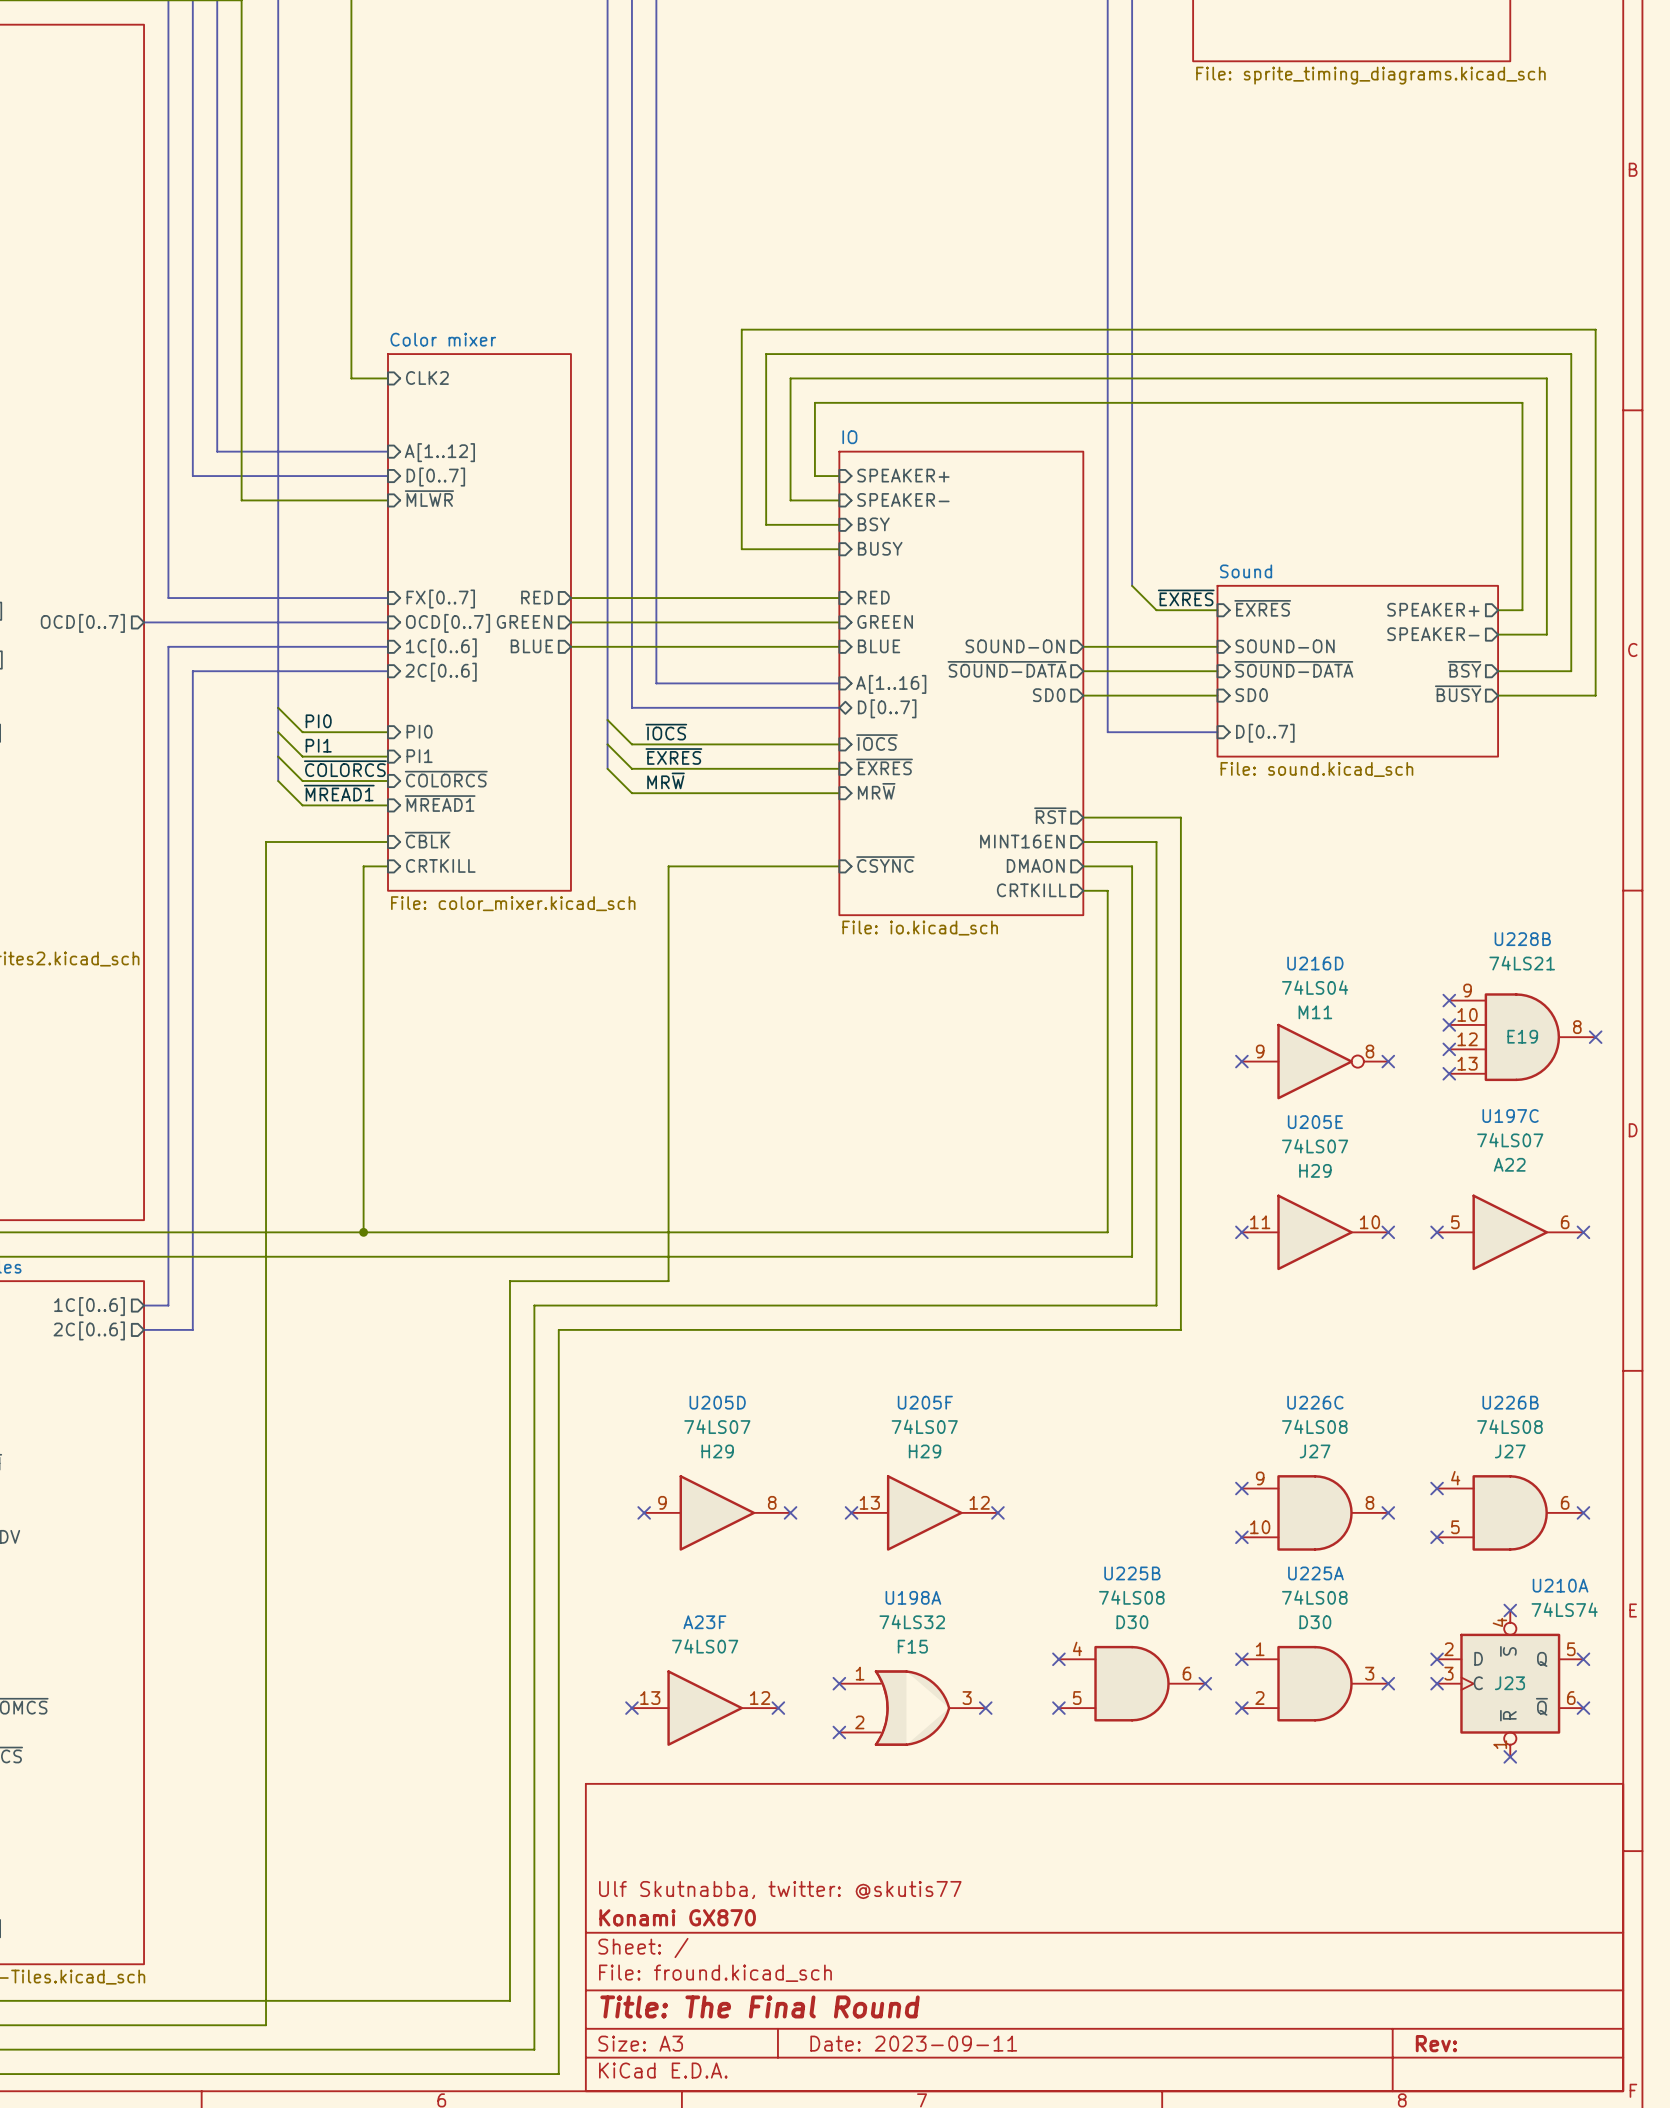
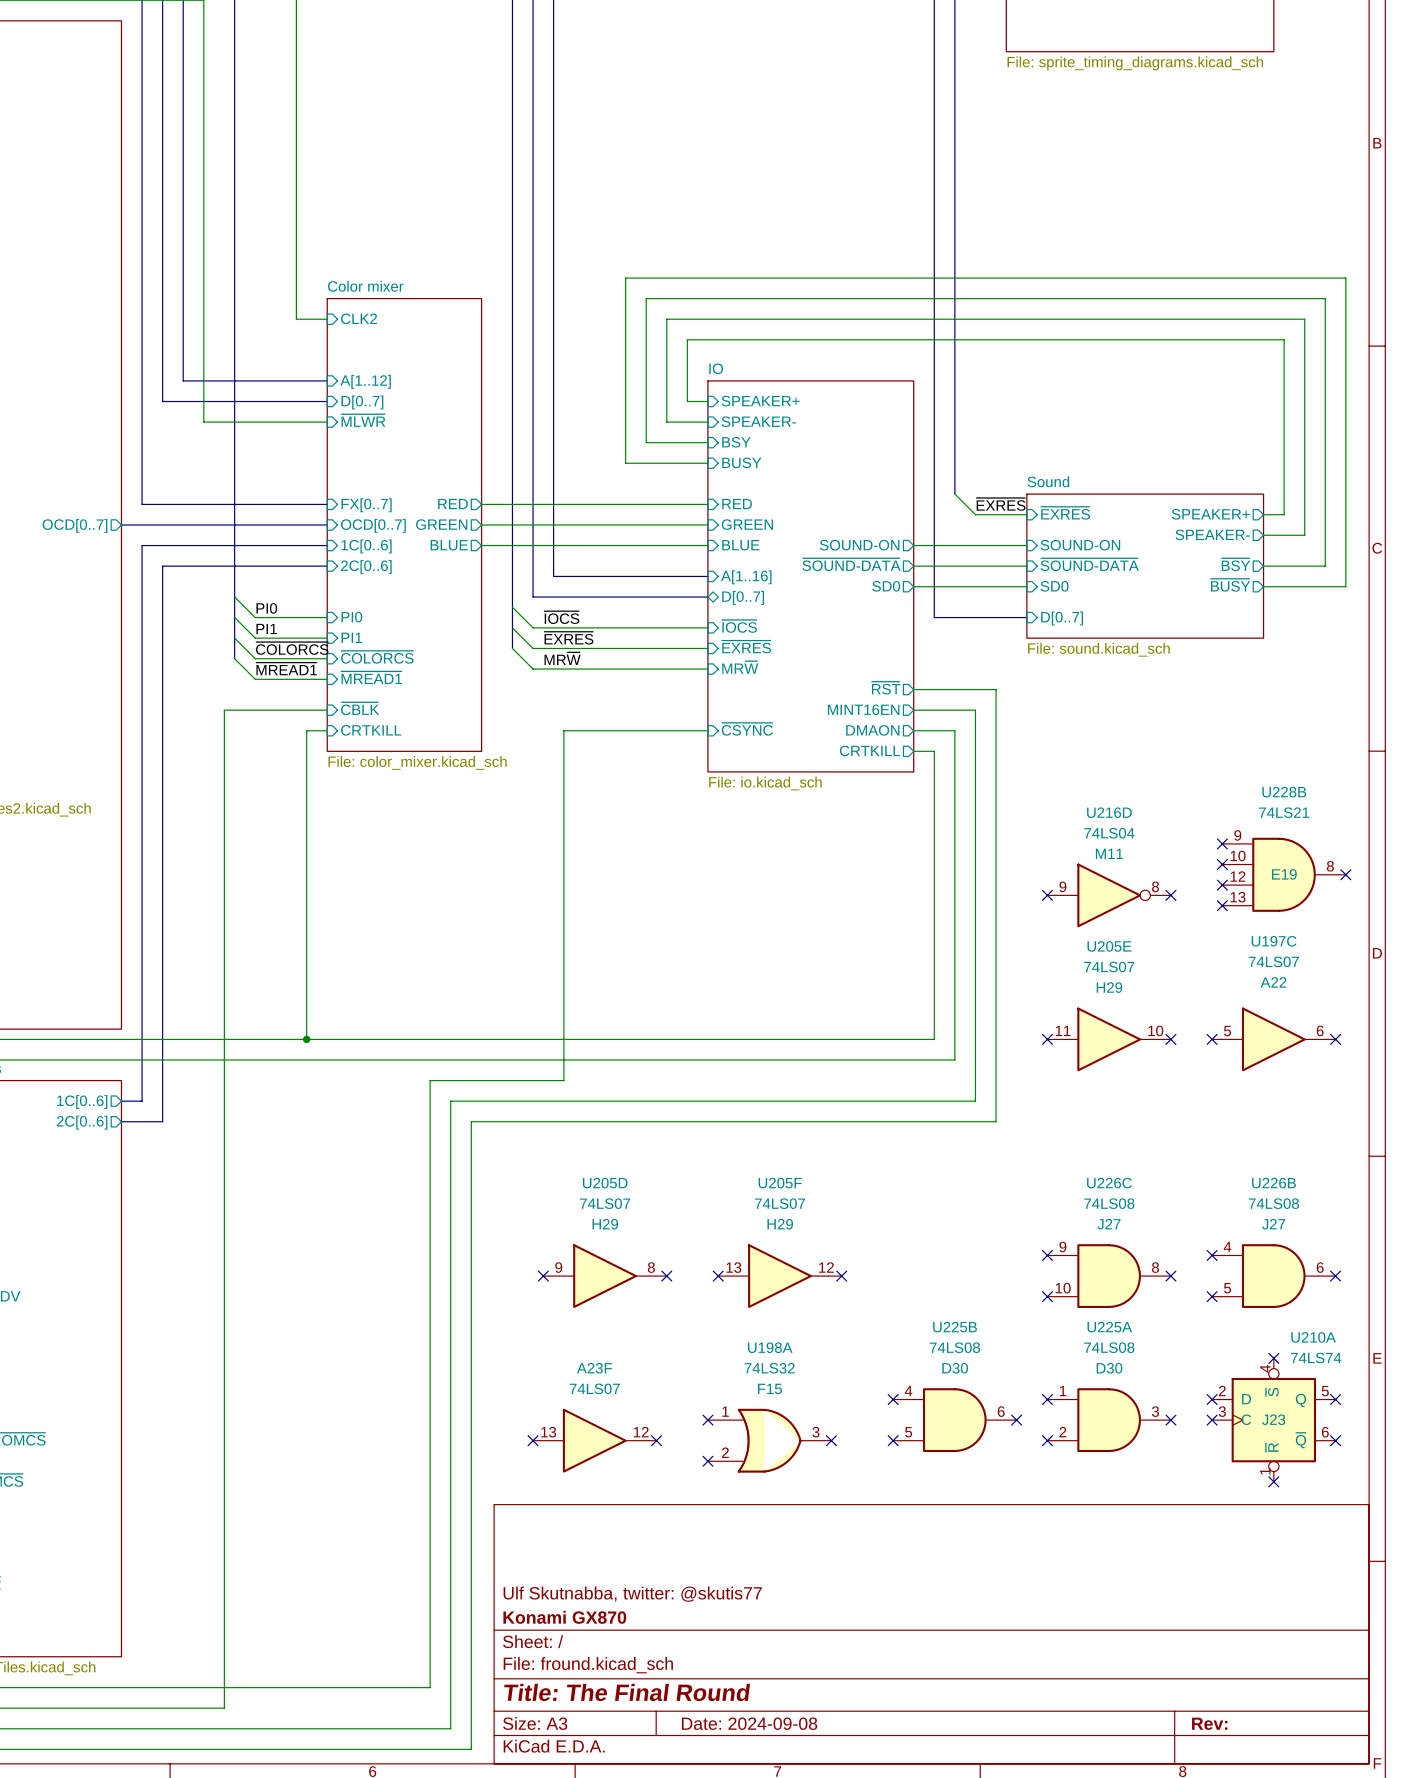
title block: Date: 2023-09-11 (913, 2043) -> Date: 2024-09-08 (749, 1723)

